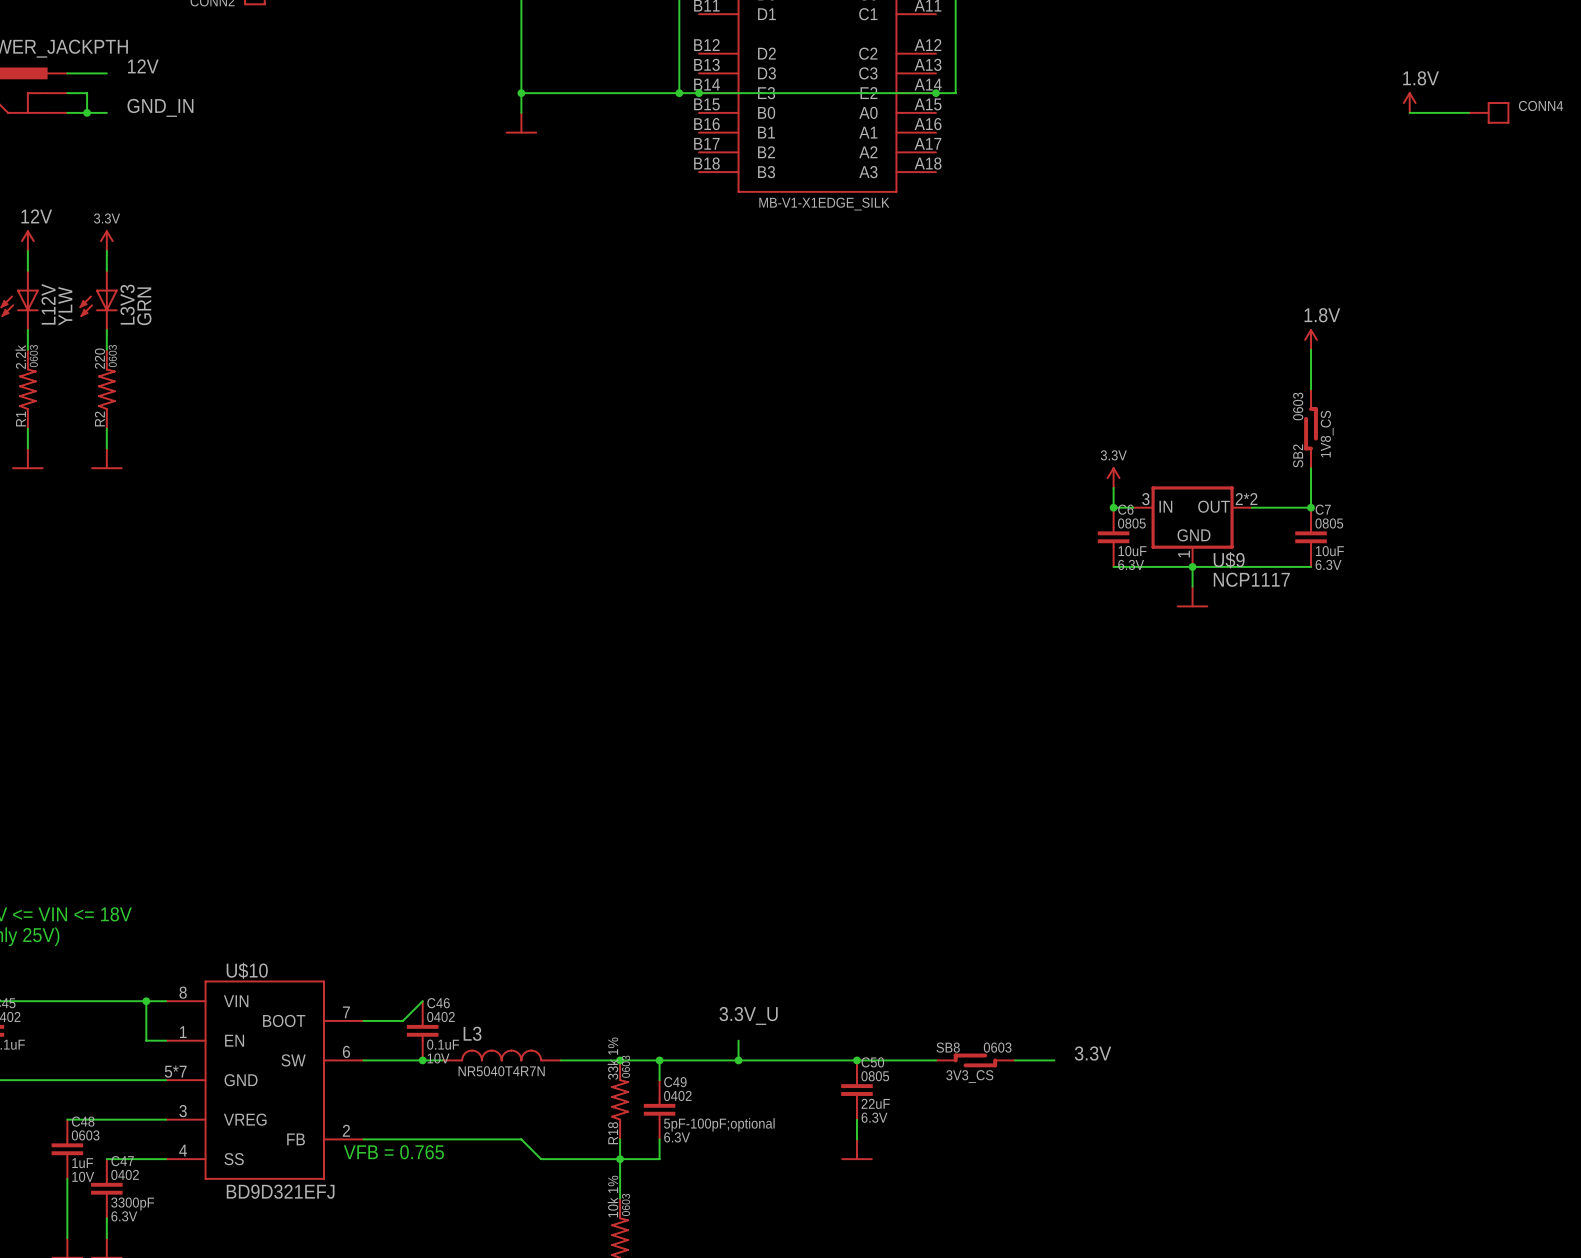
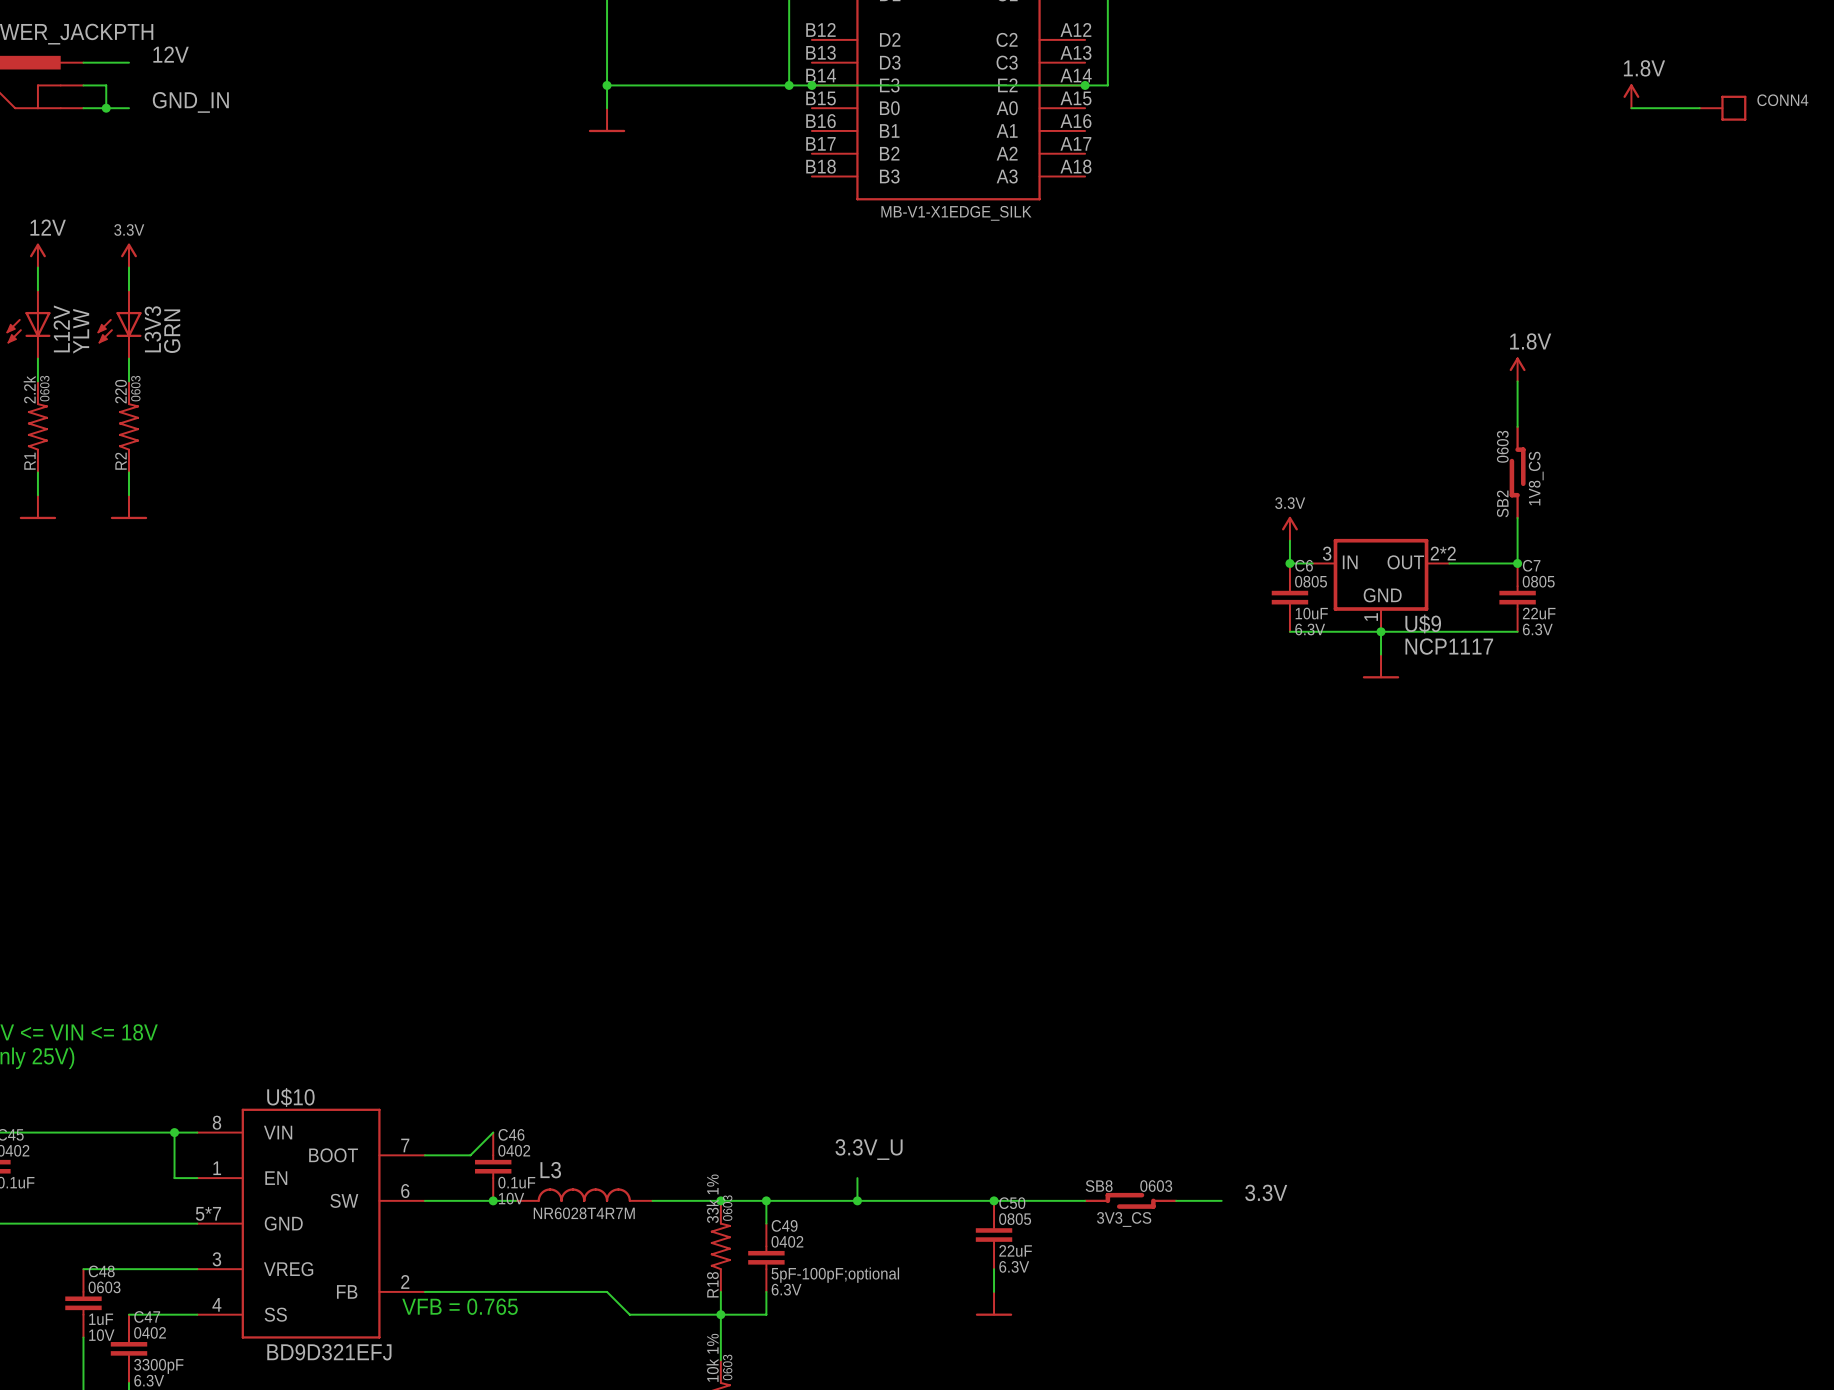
C7 value: 10uF (1329, 551) -> 22uF (1539, 613)
L3 value: NR5040T4R7N (501, 1071) -> NR6028T4R7M (584, 1213)

